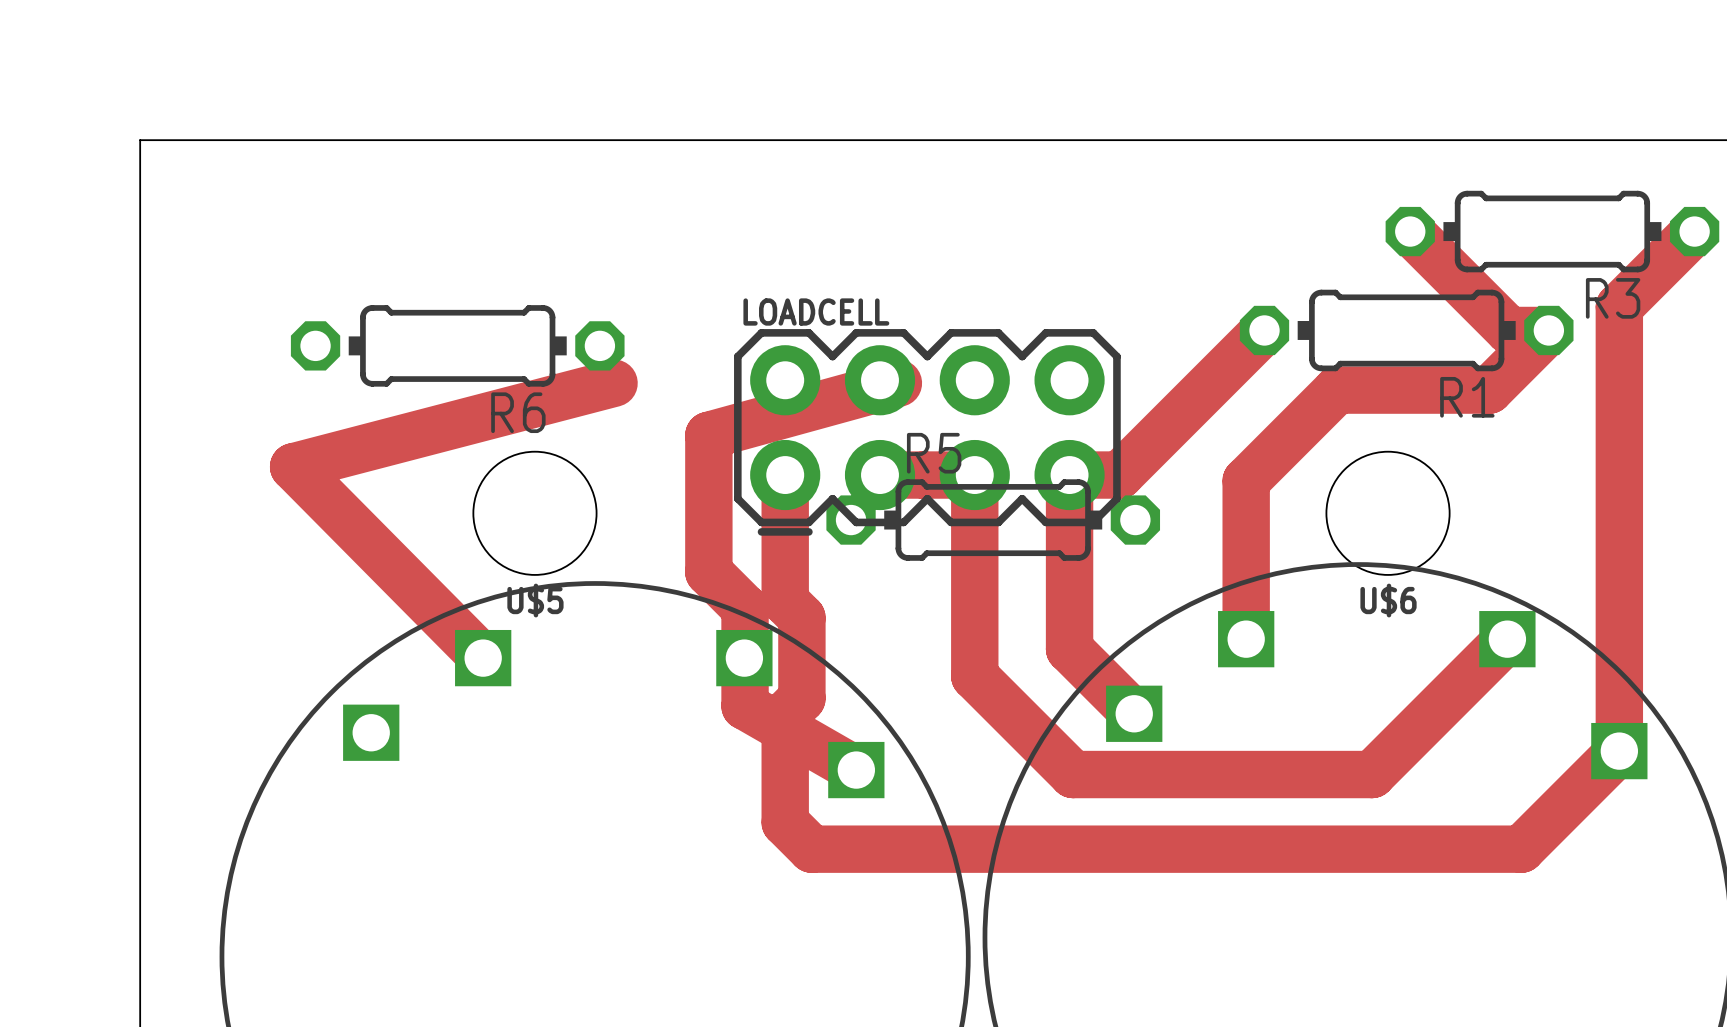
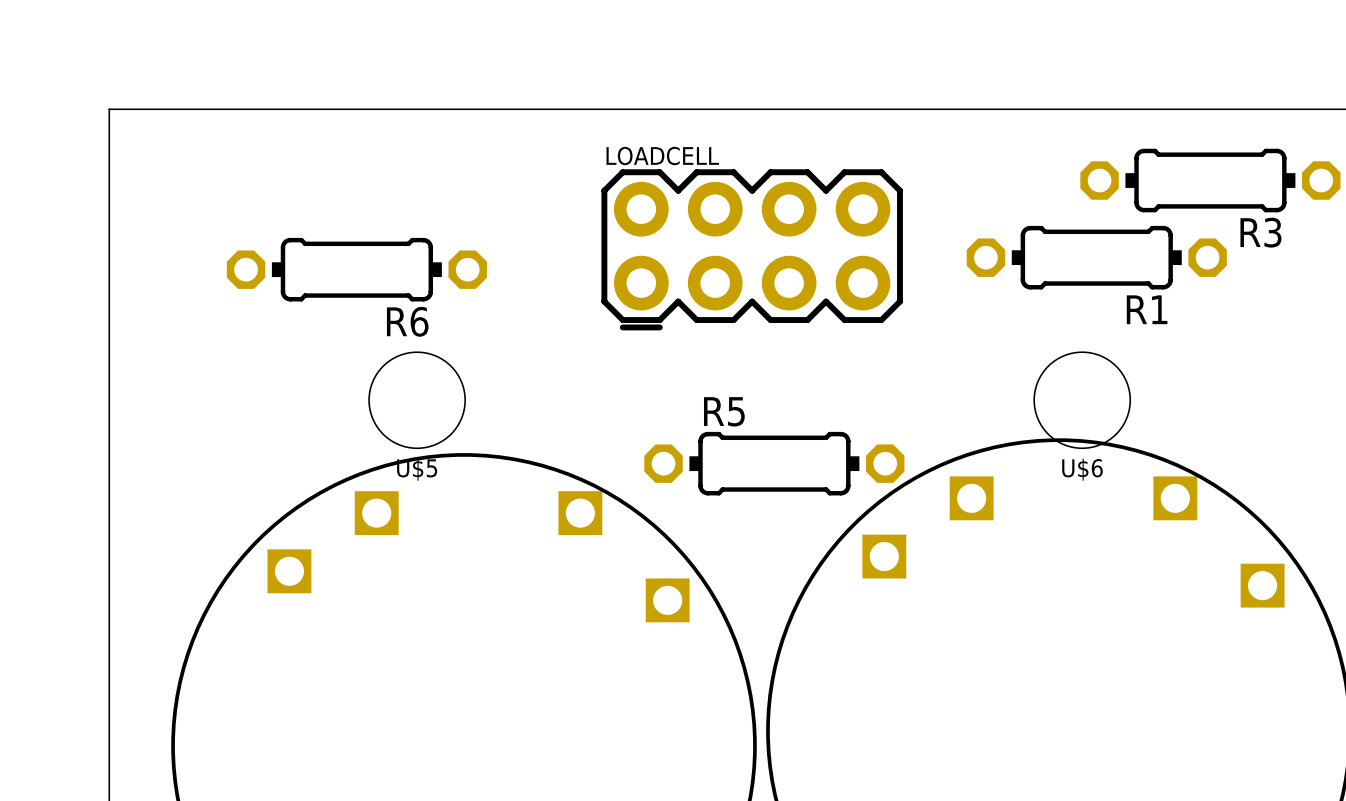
track: (1410, 231) (1509, 330) (1548, 330) (1489, 390) (1336, 390) (1246, 480) (1246, 639) -> none
track: (1694, 231) (1619, 306) (1619, 751) (1521, 849) (811, 849) (785, 822) (785, 715) (801, 698) (801, 617) (785, 601) (785, 475) -> none
track: (1264, 330) (1119, 475) (1069, 475) (1069, 649) (1134, 713) -> none
track: (614, 383) (293, 466) (483, 658) -> none
track: (898, 383) (708, 435) (708, 572) (745, 608) (745, 706) (856, 770) -> none
LOADCELL position: (927, 432) -> (752, 249)
track: (879, 475) (974, 475) (974, 676) (1073, 774) (1372, 774) (1507, 639) -> none
R5 position: (993, 520) -> (774, 463)

